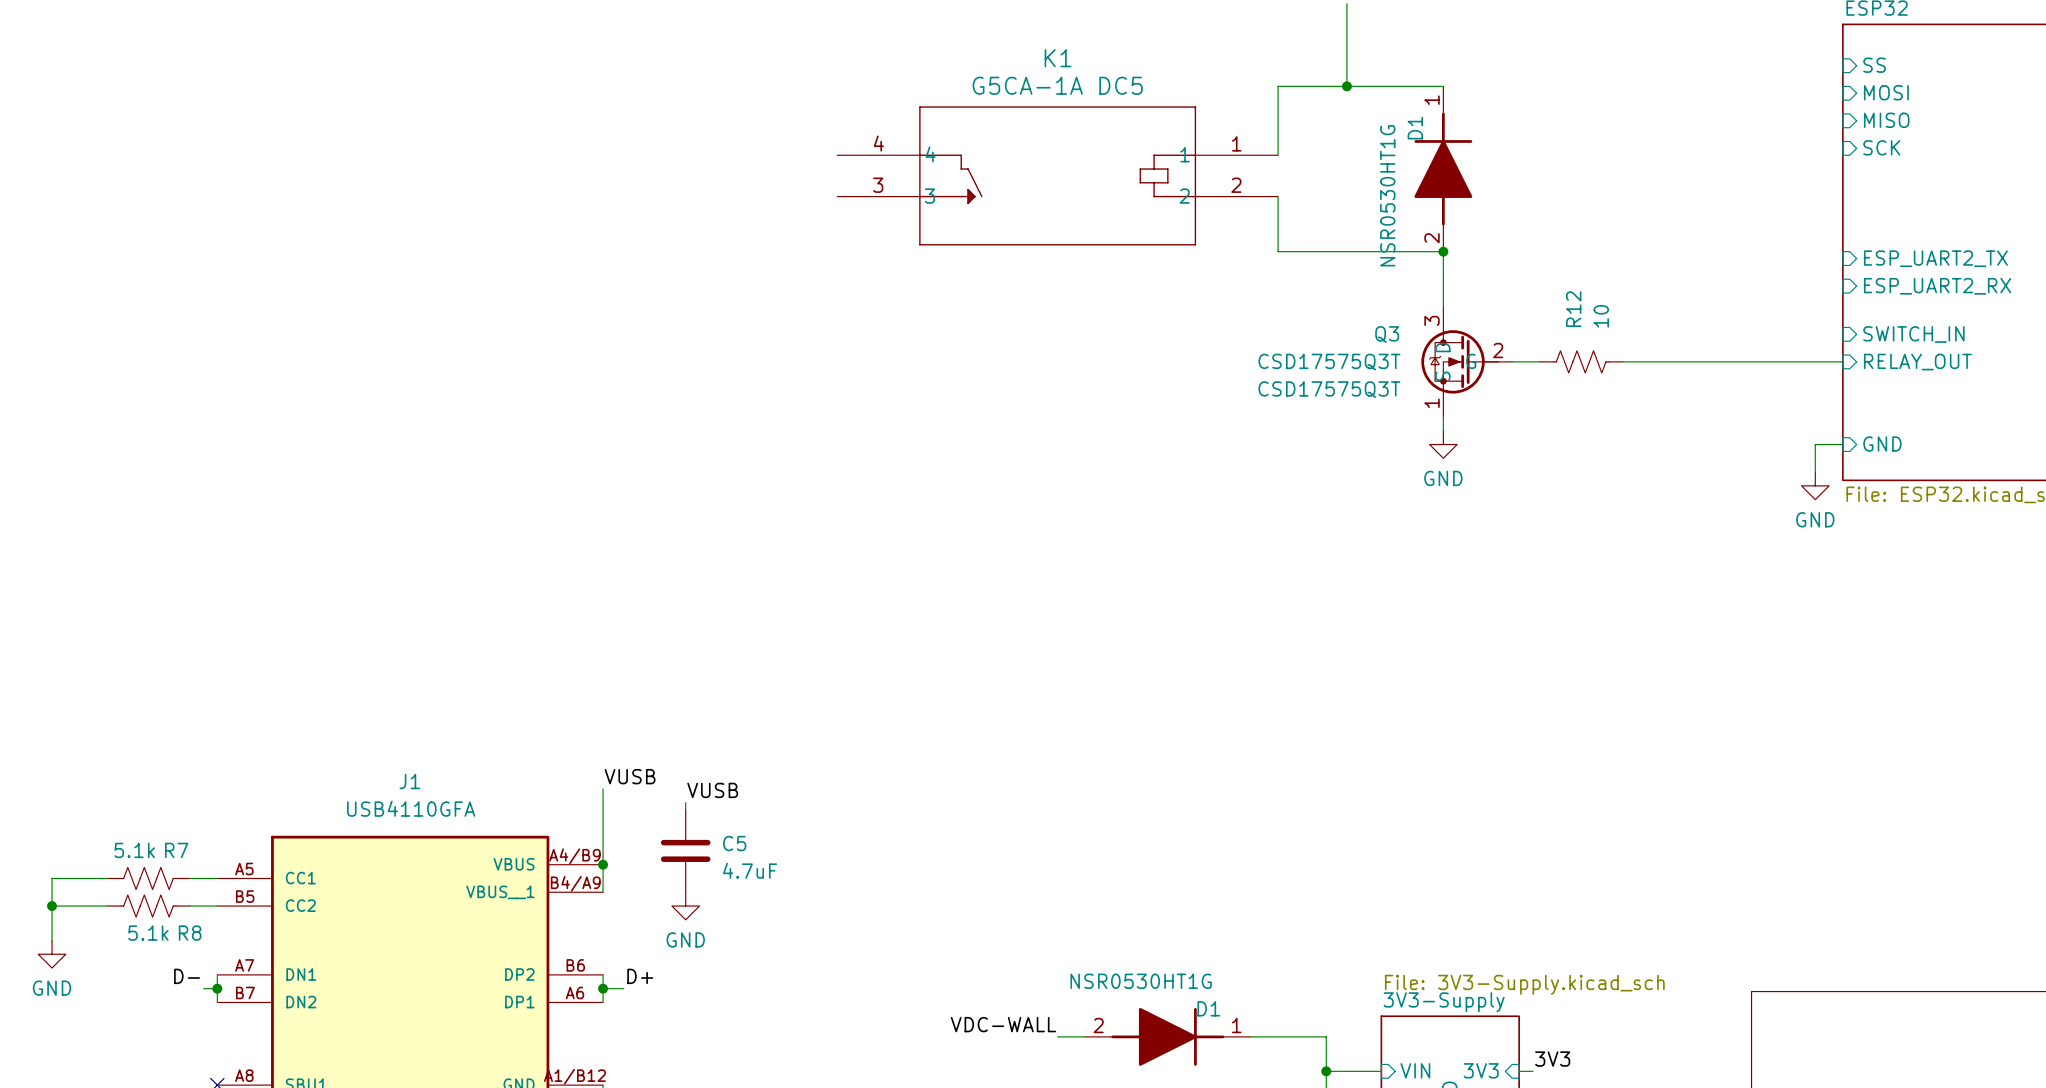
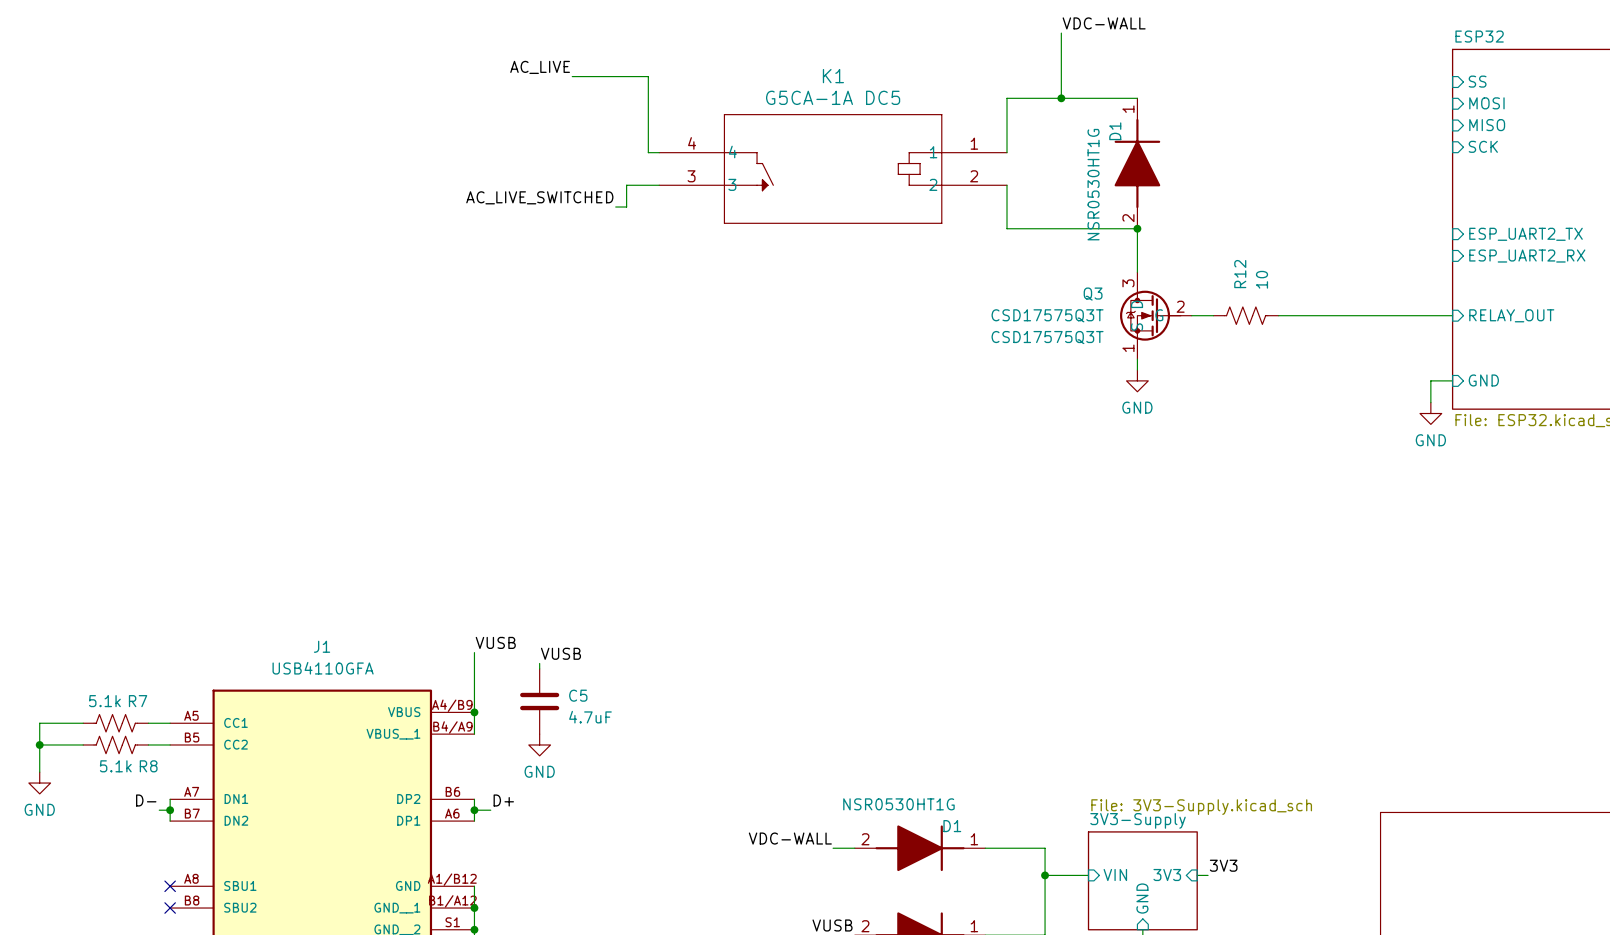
label: none -> AC_LIVE (540, 67)
wire: none -> (572, 76) (648, 76) (648, 152) (659, 152)
wire: none -> (659, 185) (626, 185) (626, 207) (615, 207)
label: none -> AC_LIVE_SWITCHED (539, 197)
sheet pin: SWITCH_IN (1913, 334) -> none

